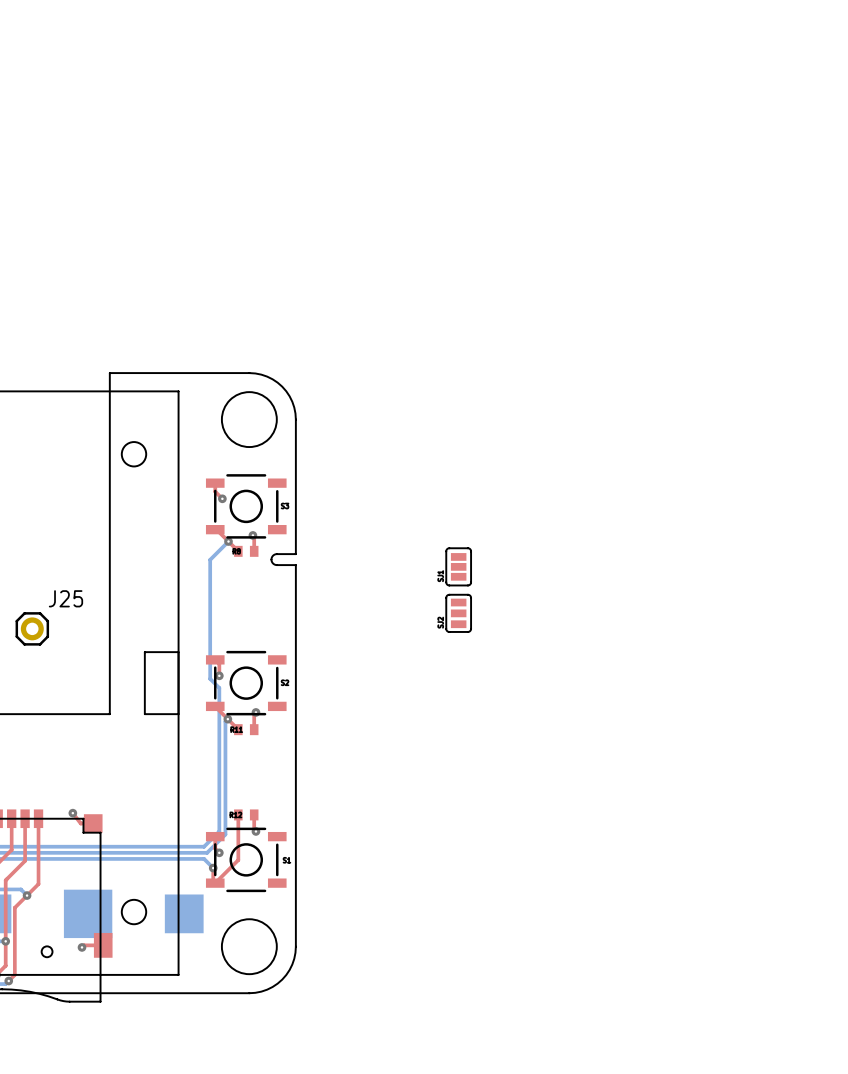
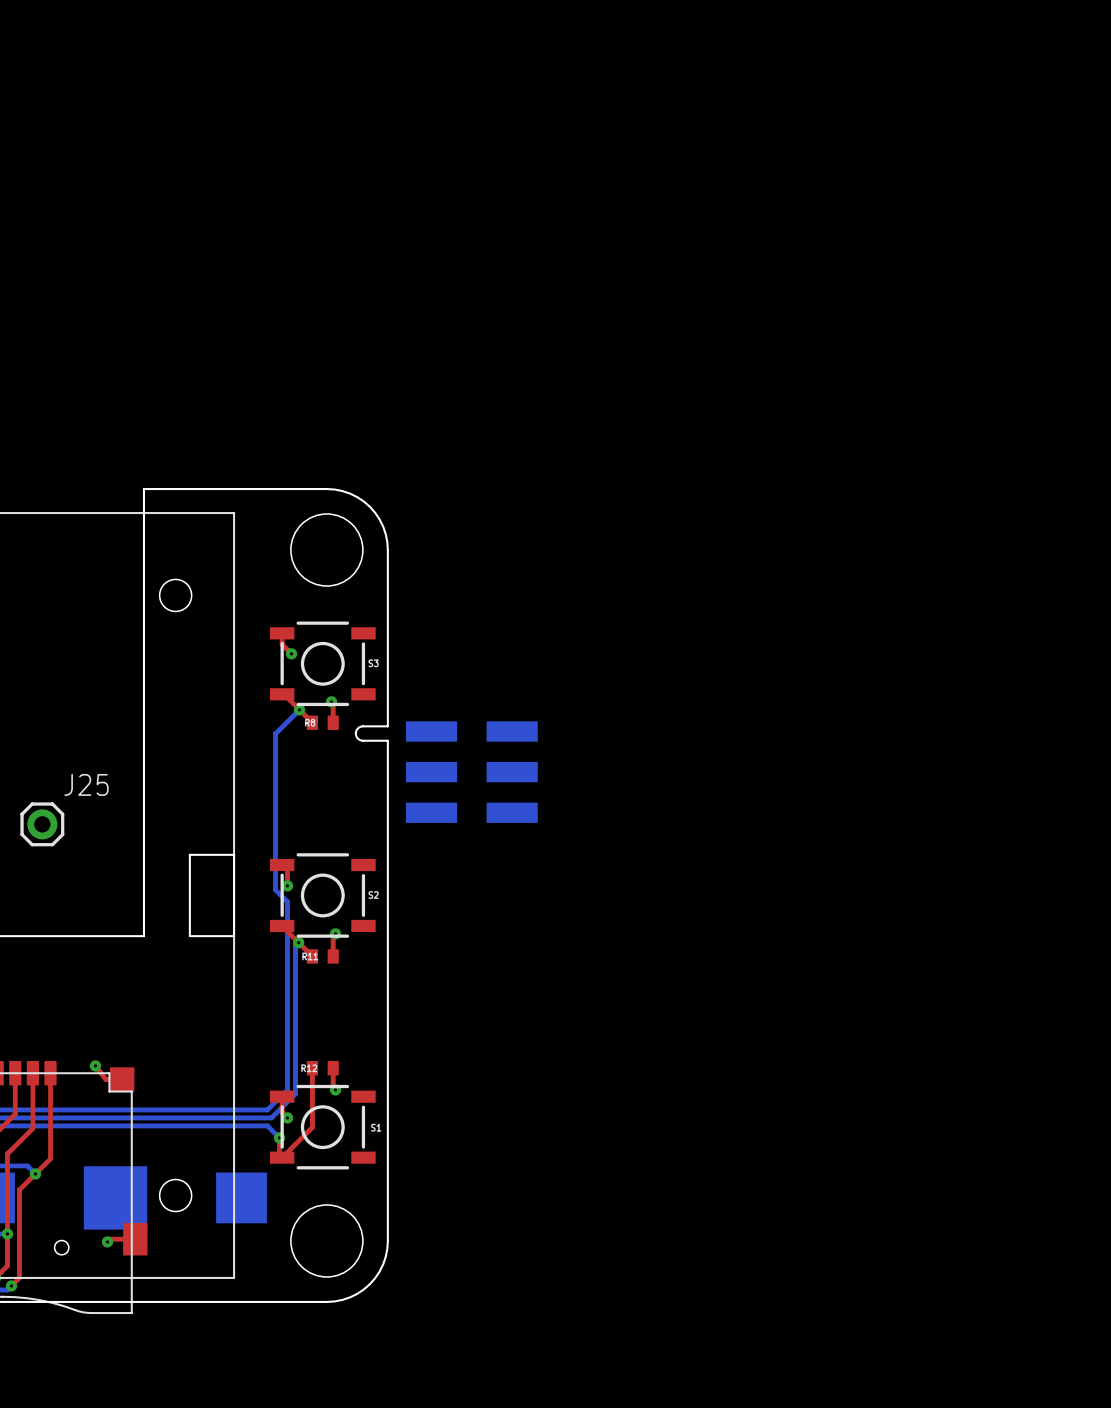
part: (458, 566) -> none
part: none -> (471, 772)
part: (458, 613) -> none

